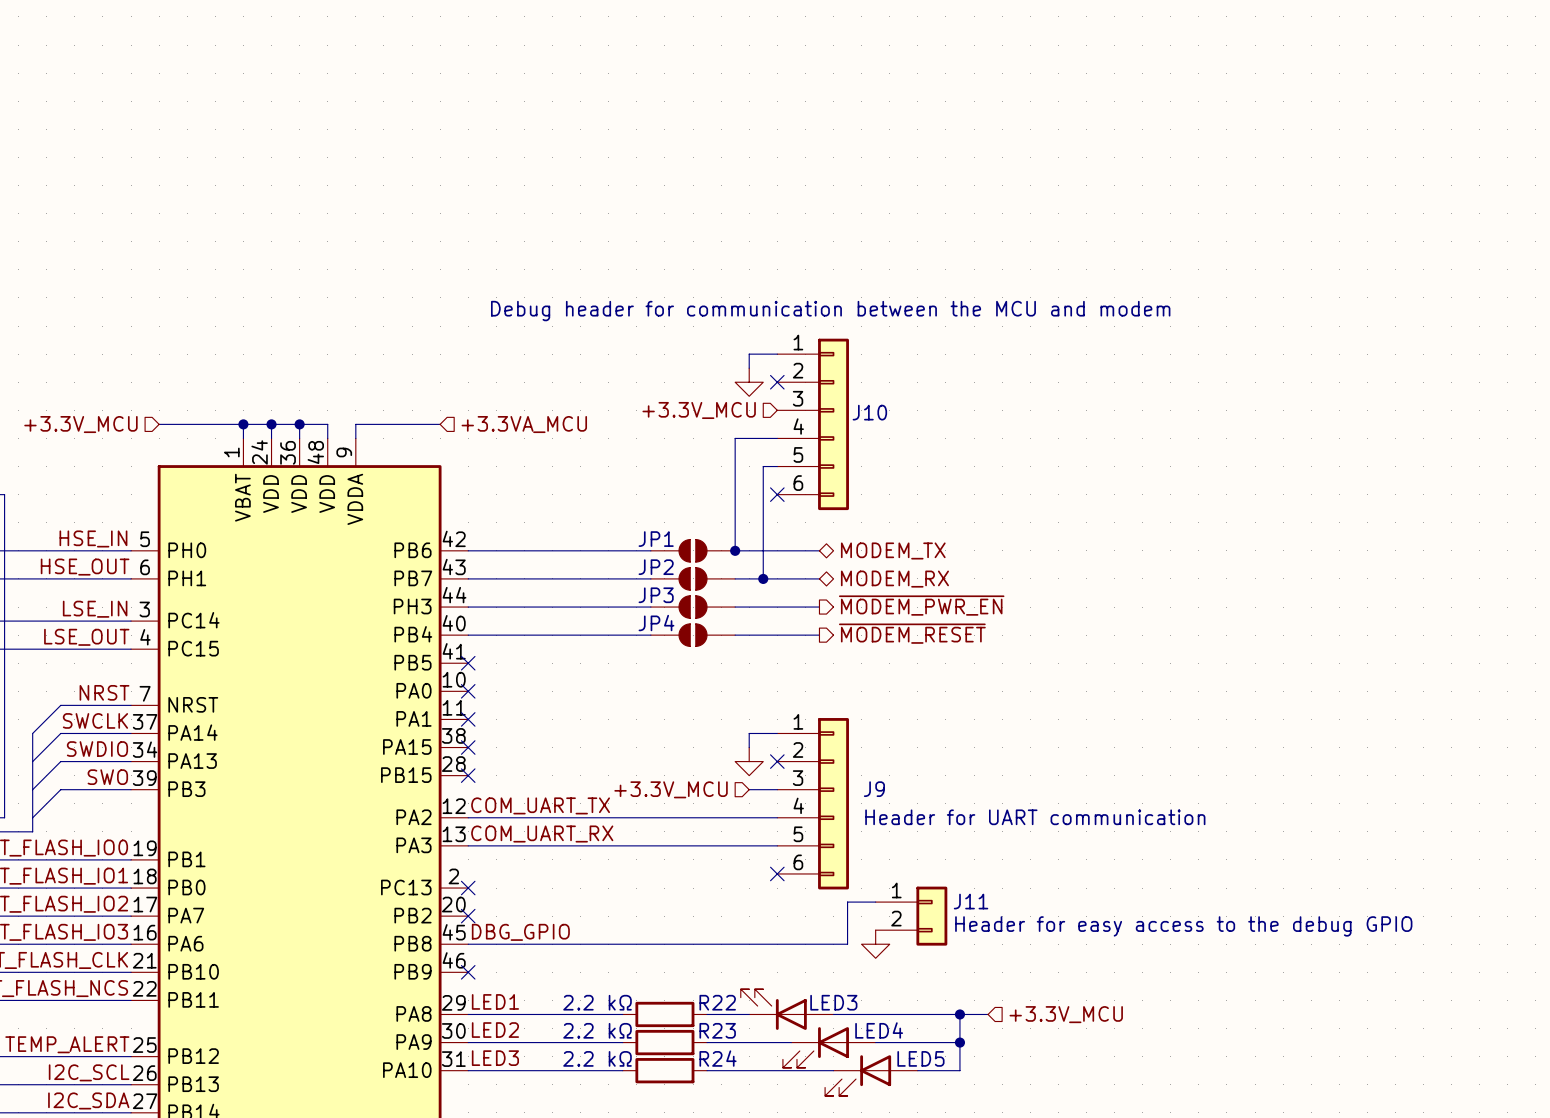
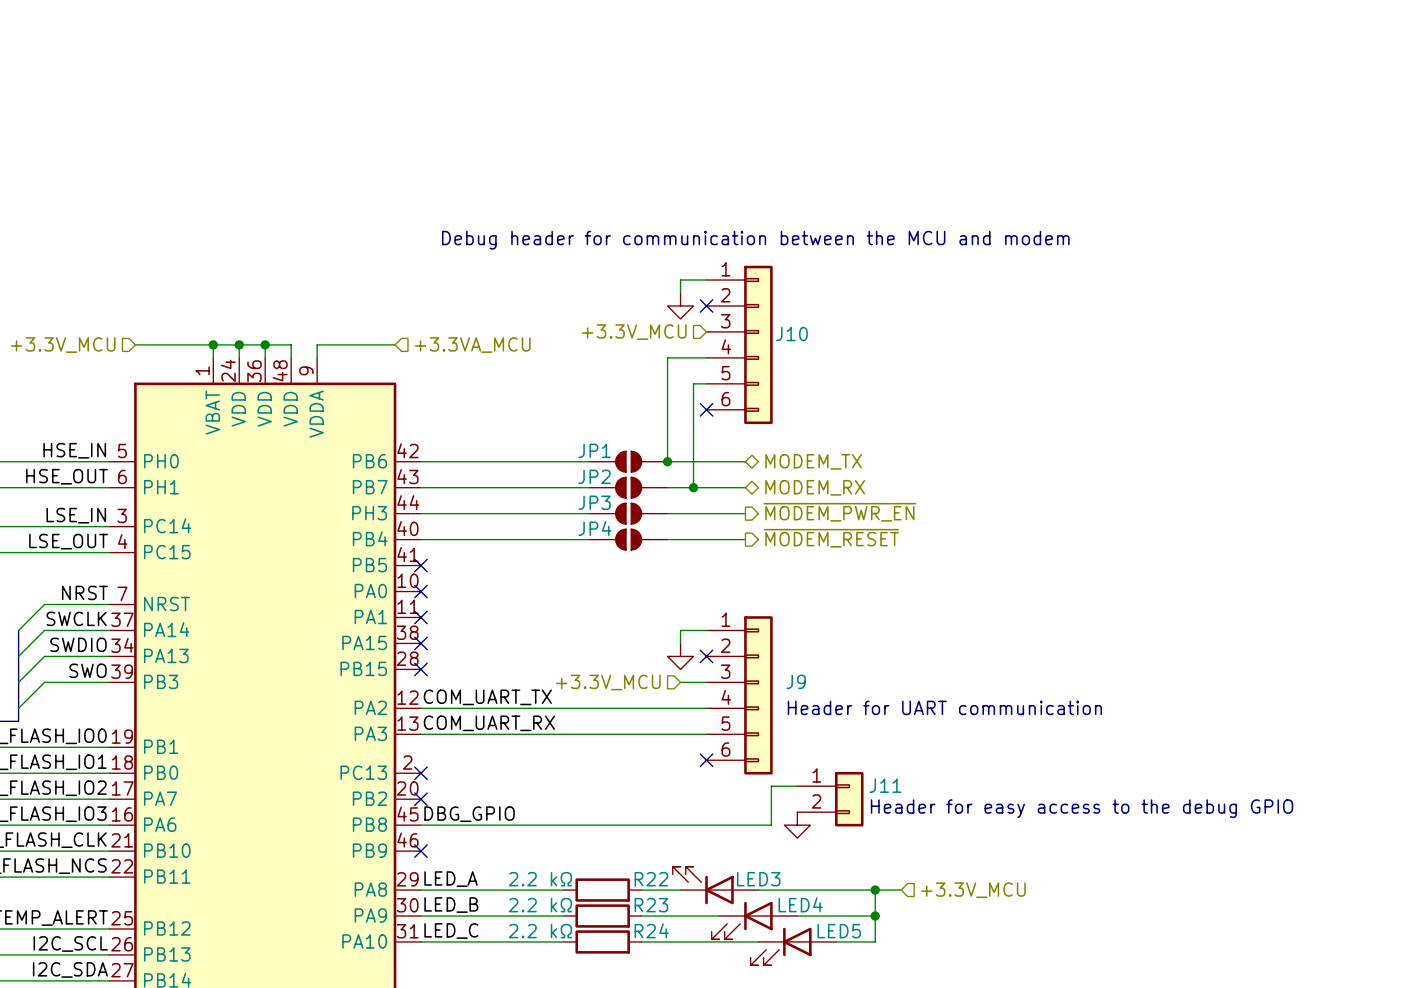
label: LED1 (495, 1001) -> LED_A (451, 879)
label: LED2 (495, 1030) -> LED_B (451, 905)
label: LED3 (495, 1058) -> LED_C (451, 931)

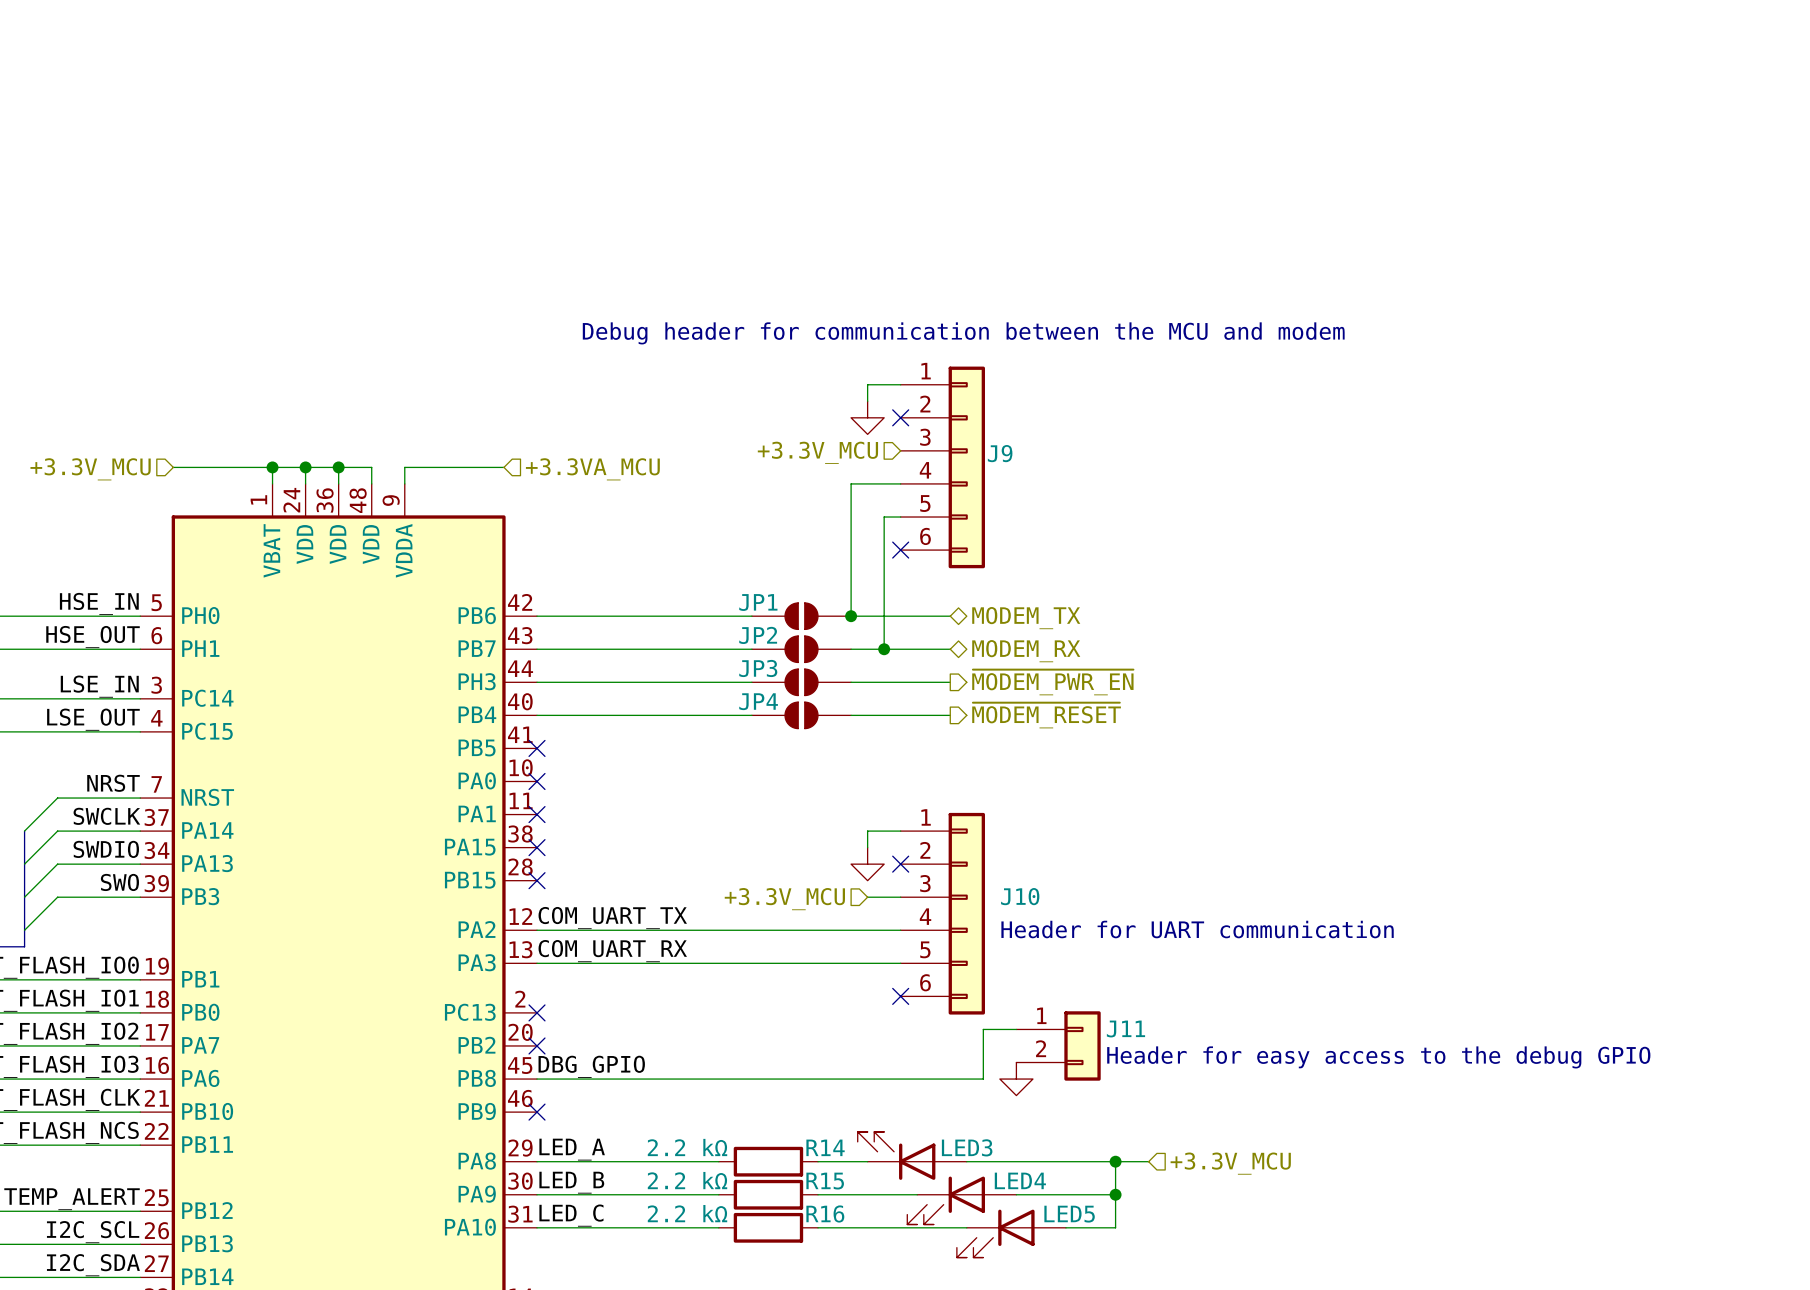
J10 name: J10 (792, 334) -> J9 (1000, 453)
J9 name: J9 (796, 681) -> J10 (1020, 896)
R22 name: R22 (651, 879) -> R14 (825, 1147)
R23 name: R23 (651, 905) -> R15 (825, 1181)
R24 name: R24 (651, 930) -> R16 (825, 1213)

